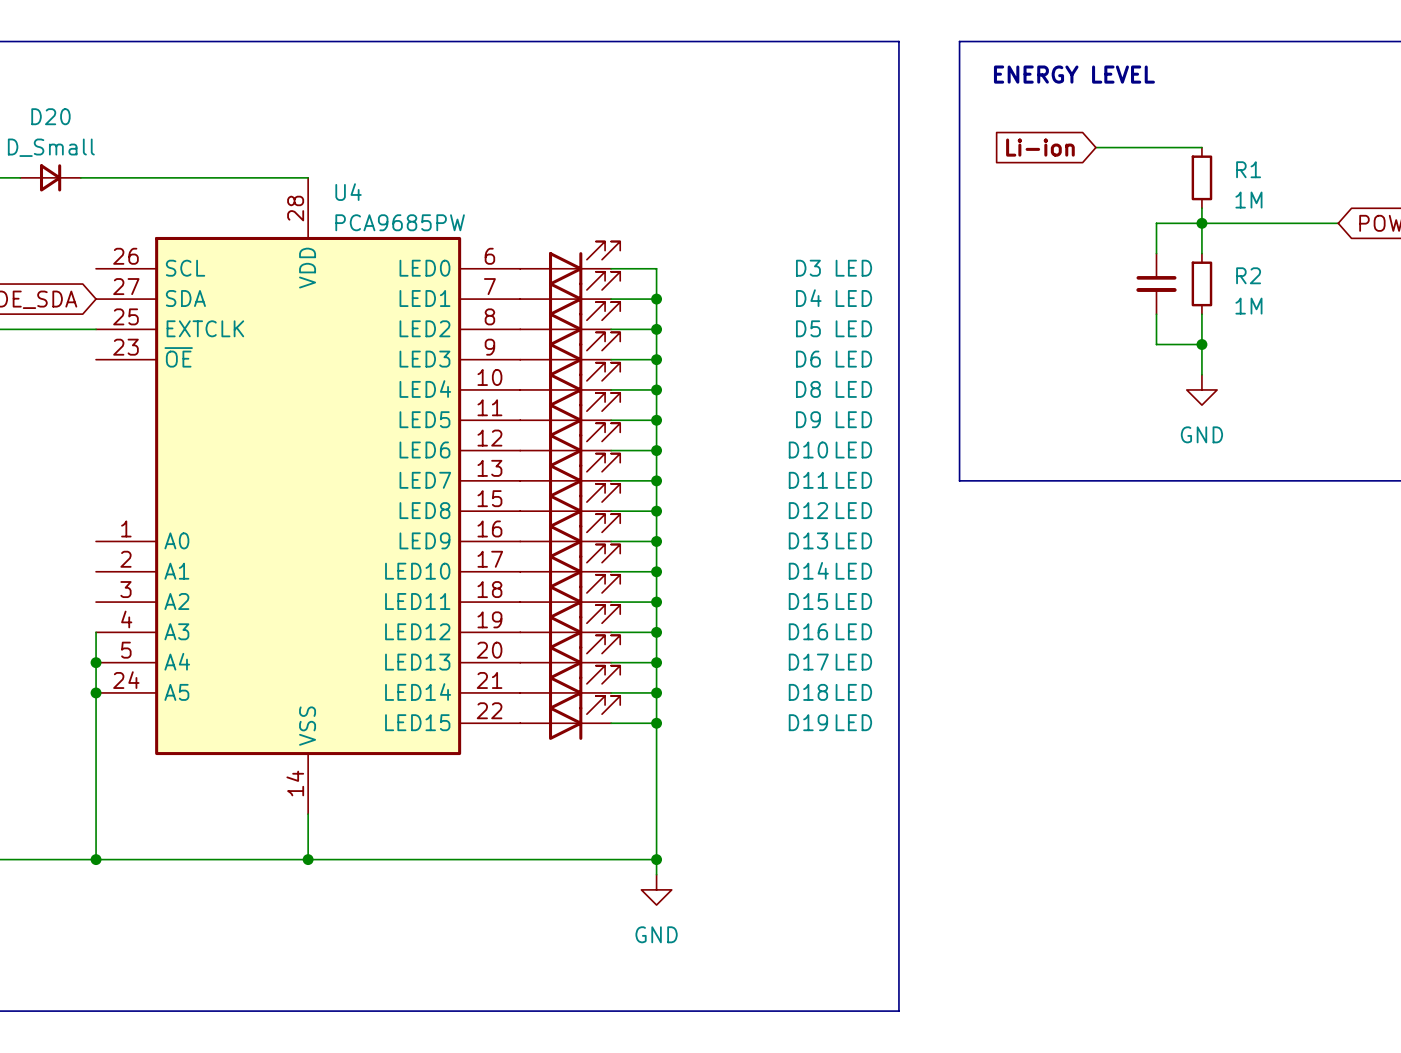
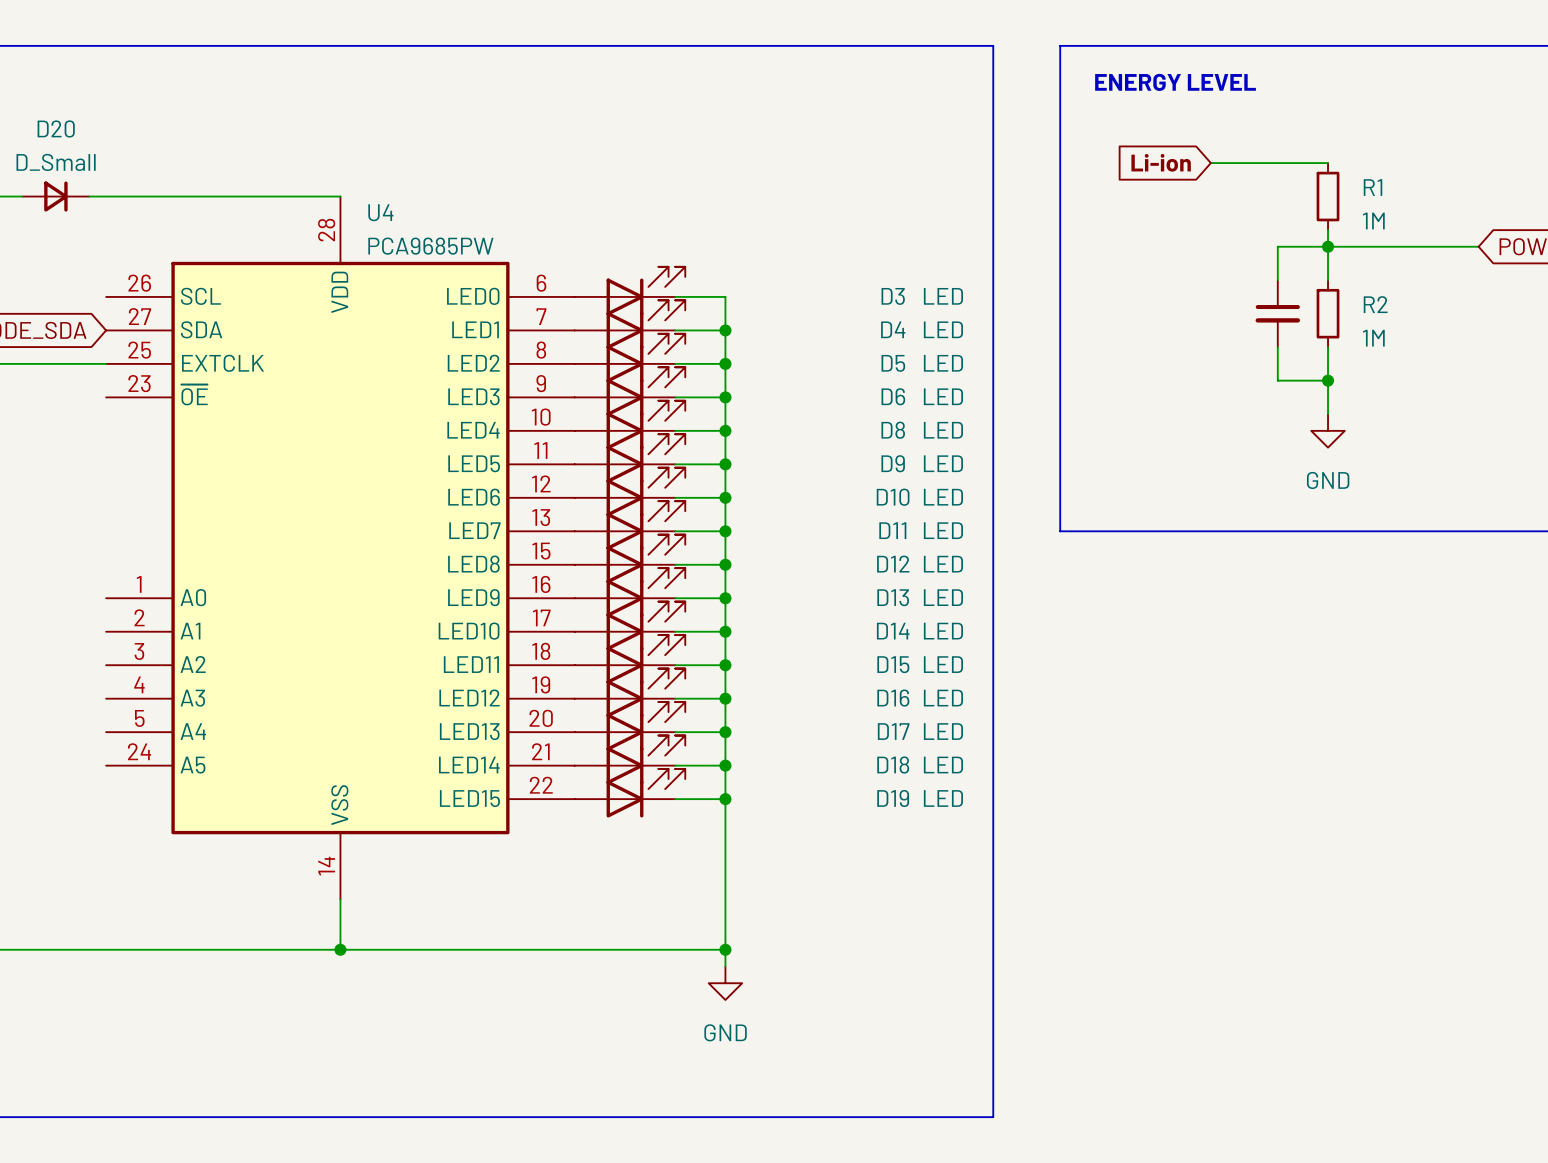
wire: (96, 632) (96, 859) -> none
junction: (96, 662) -> none
junction: (96, 692) -> none
junction: (96, 859) -> none

